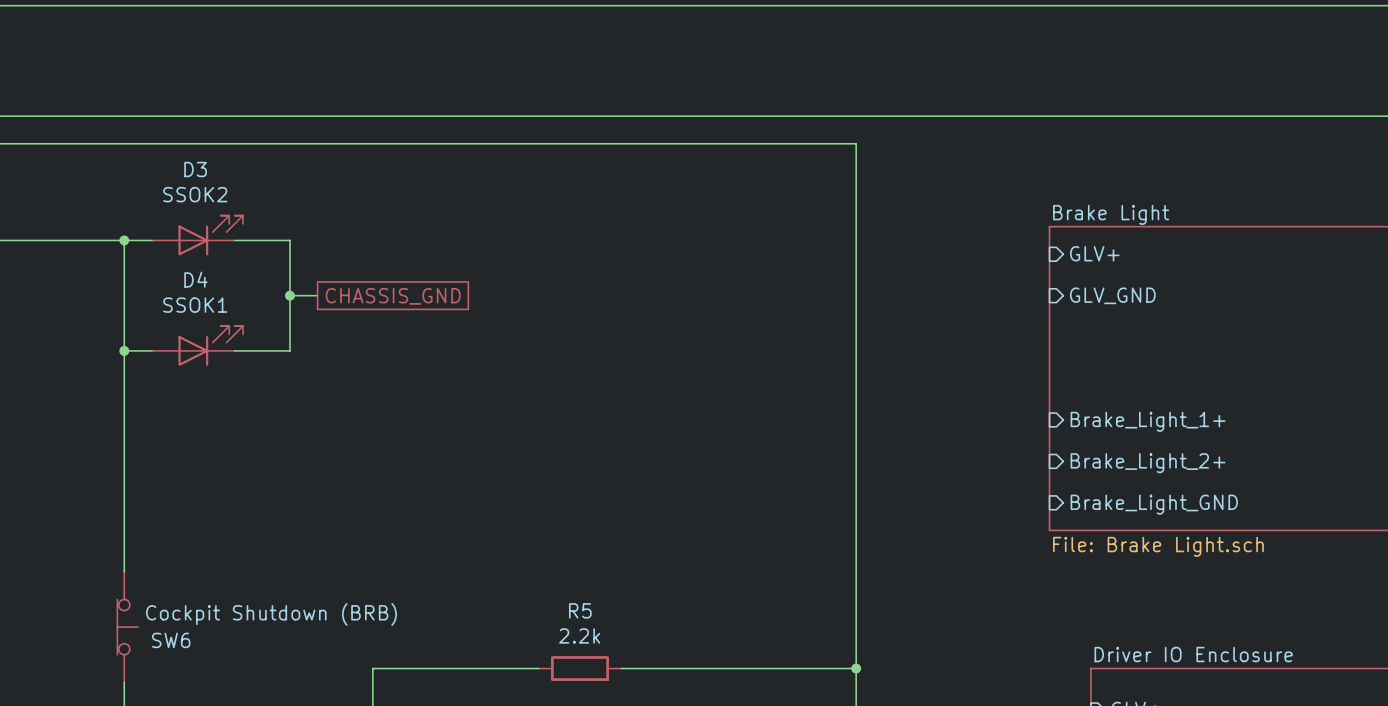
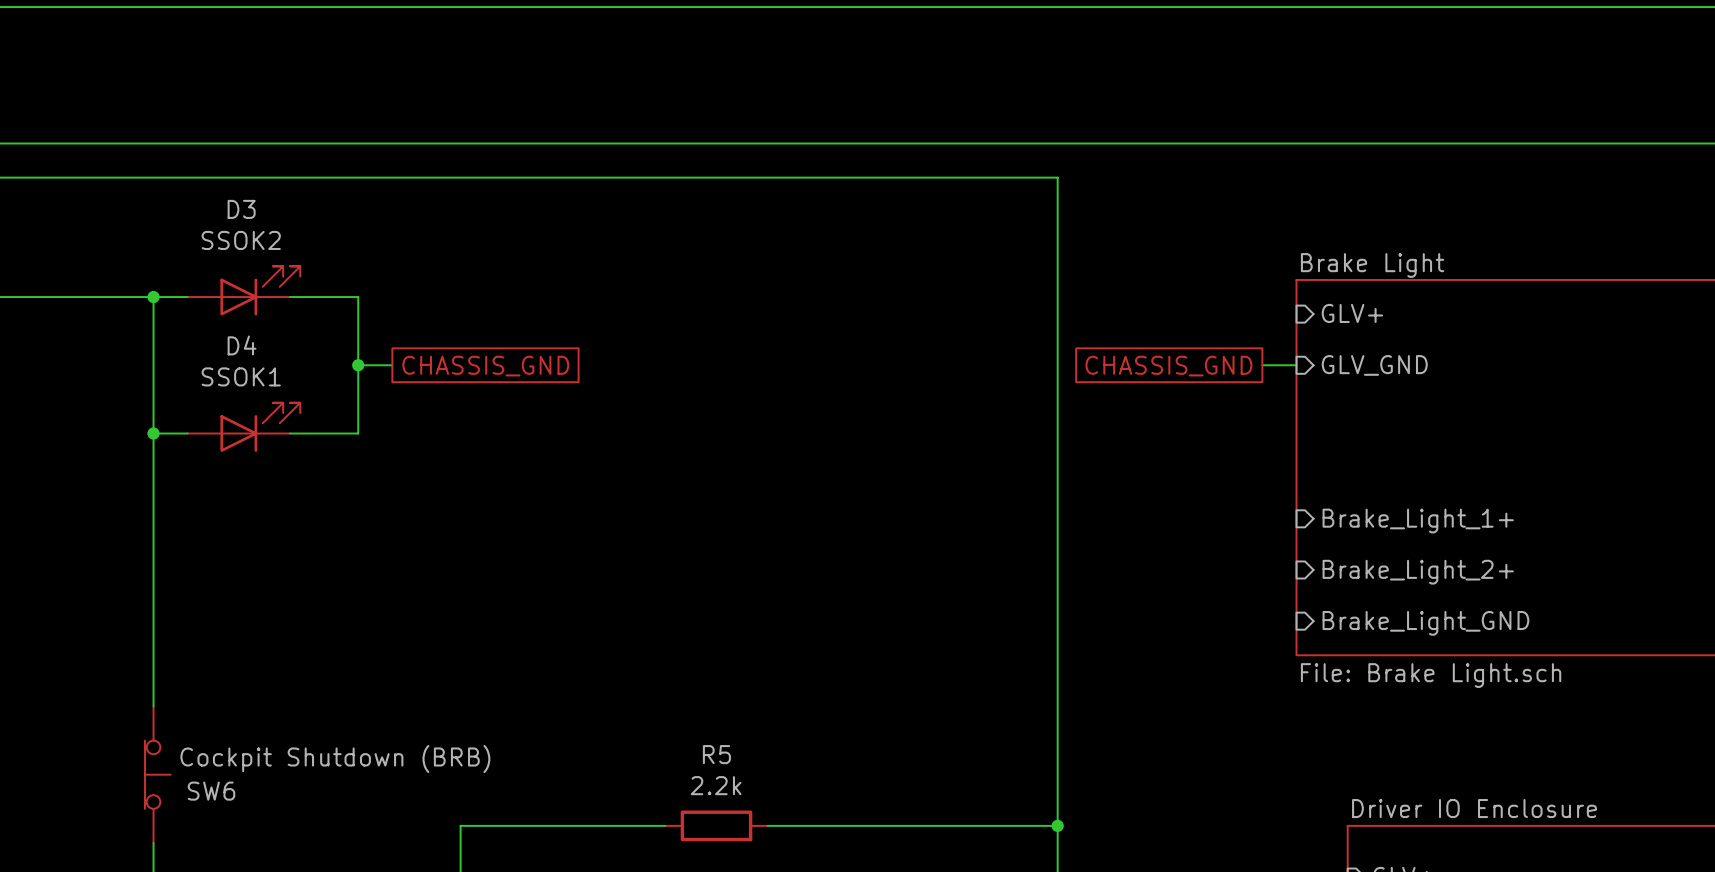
wire: none -> (1262, 365) (1296, 365)
global label: none -> CHASSIS_GND (1168, 366)

